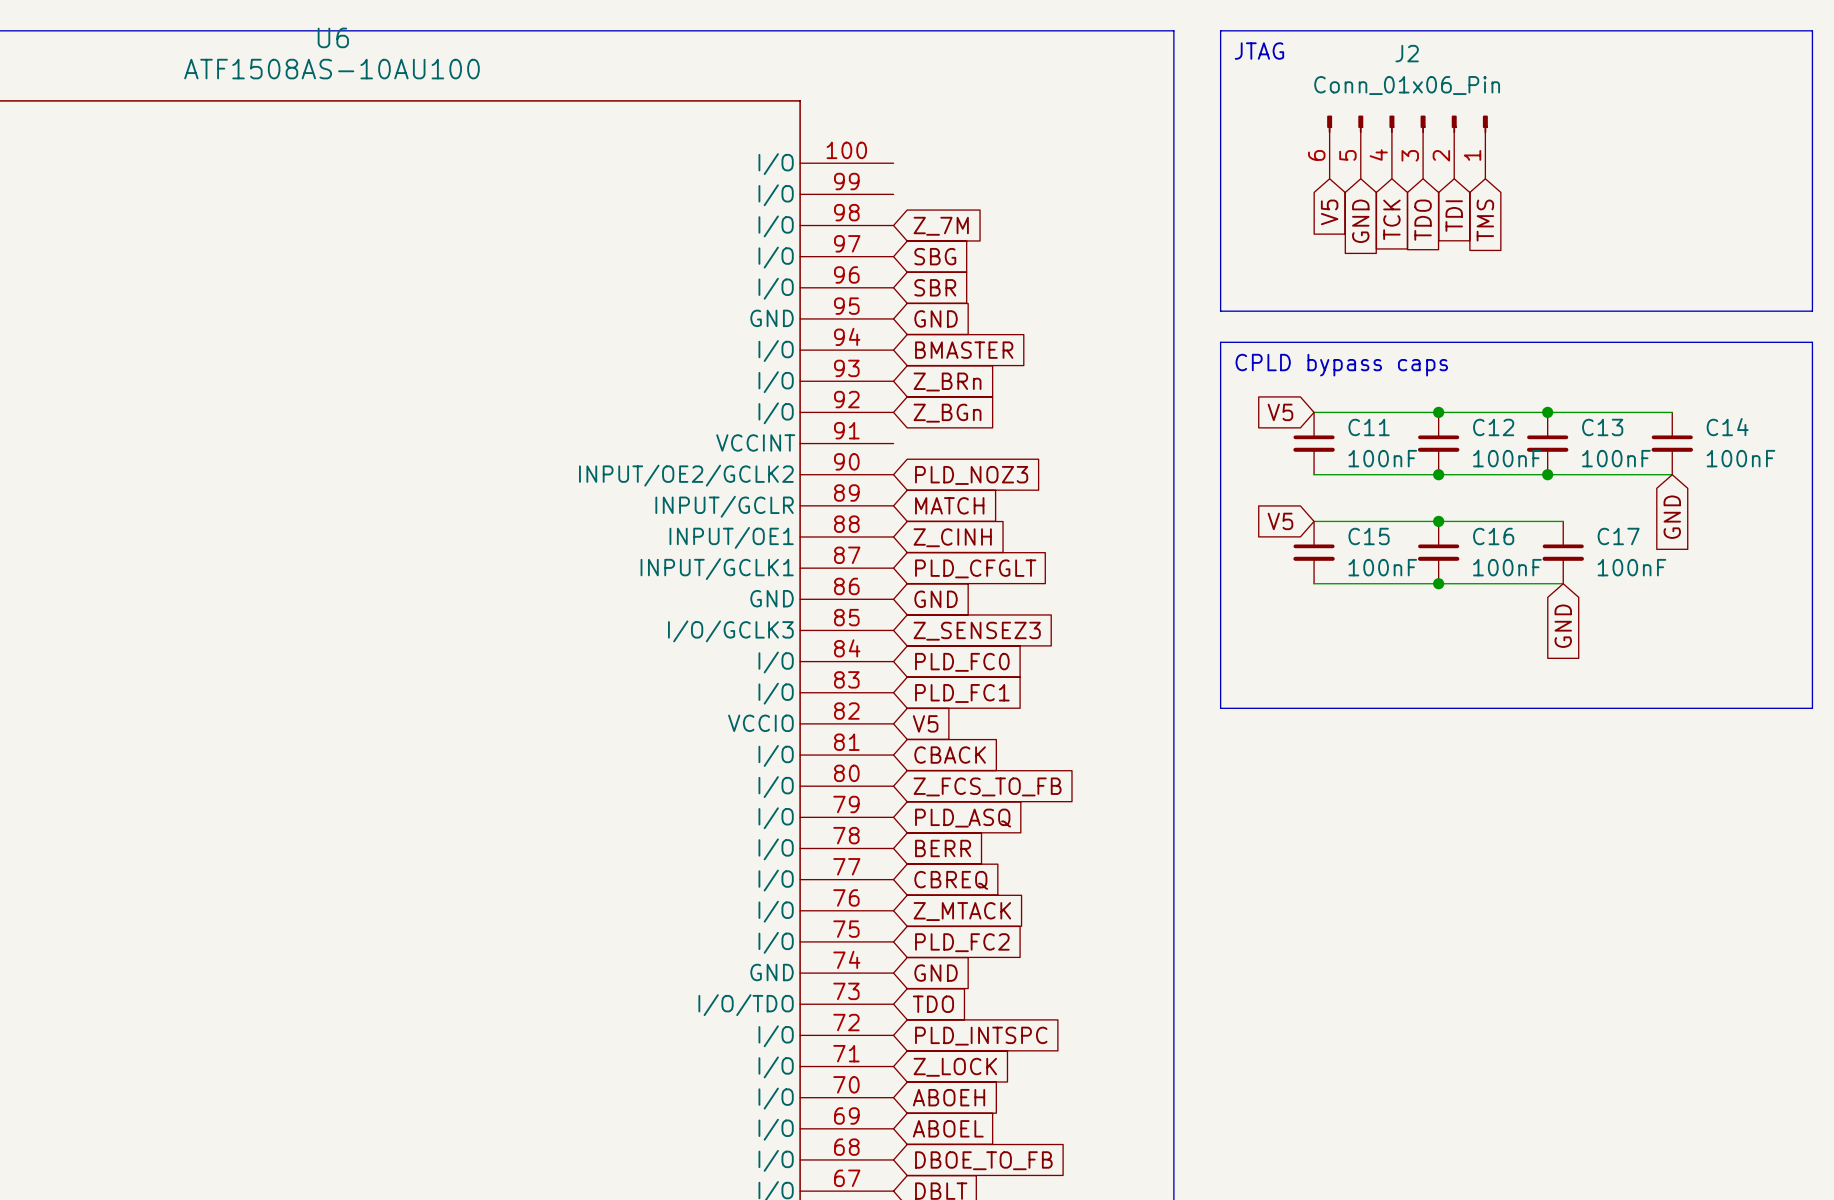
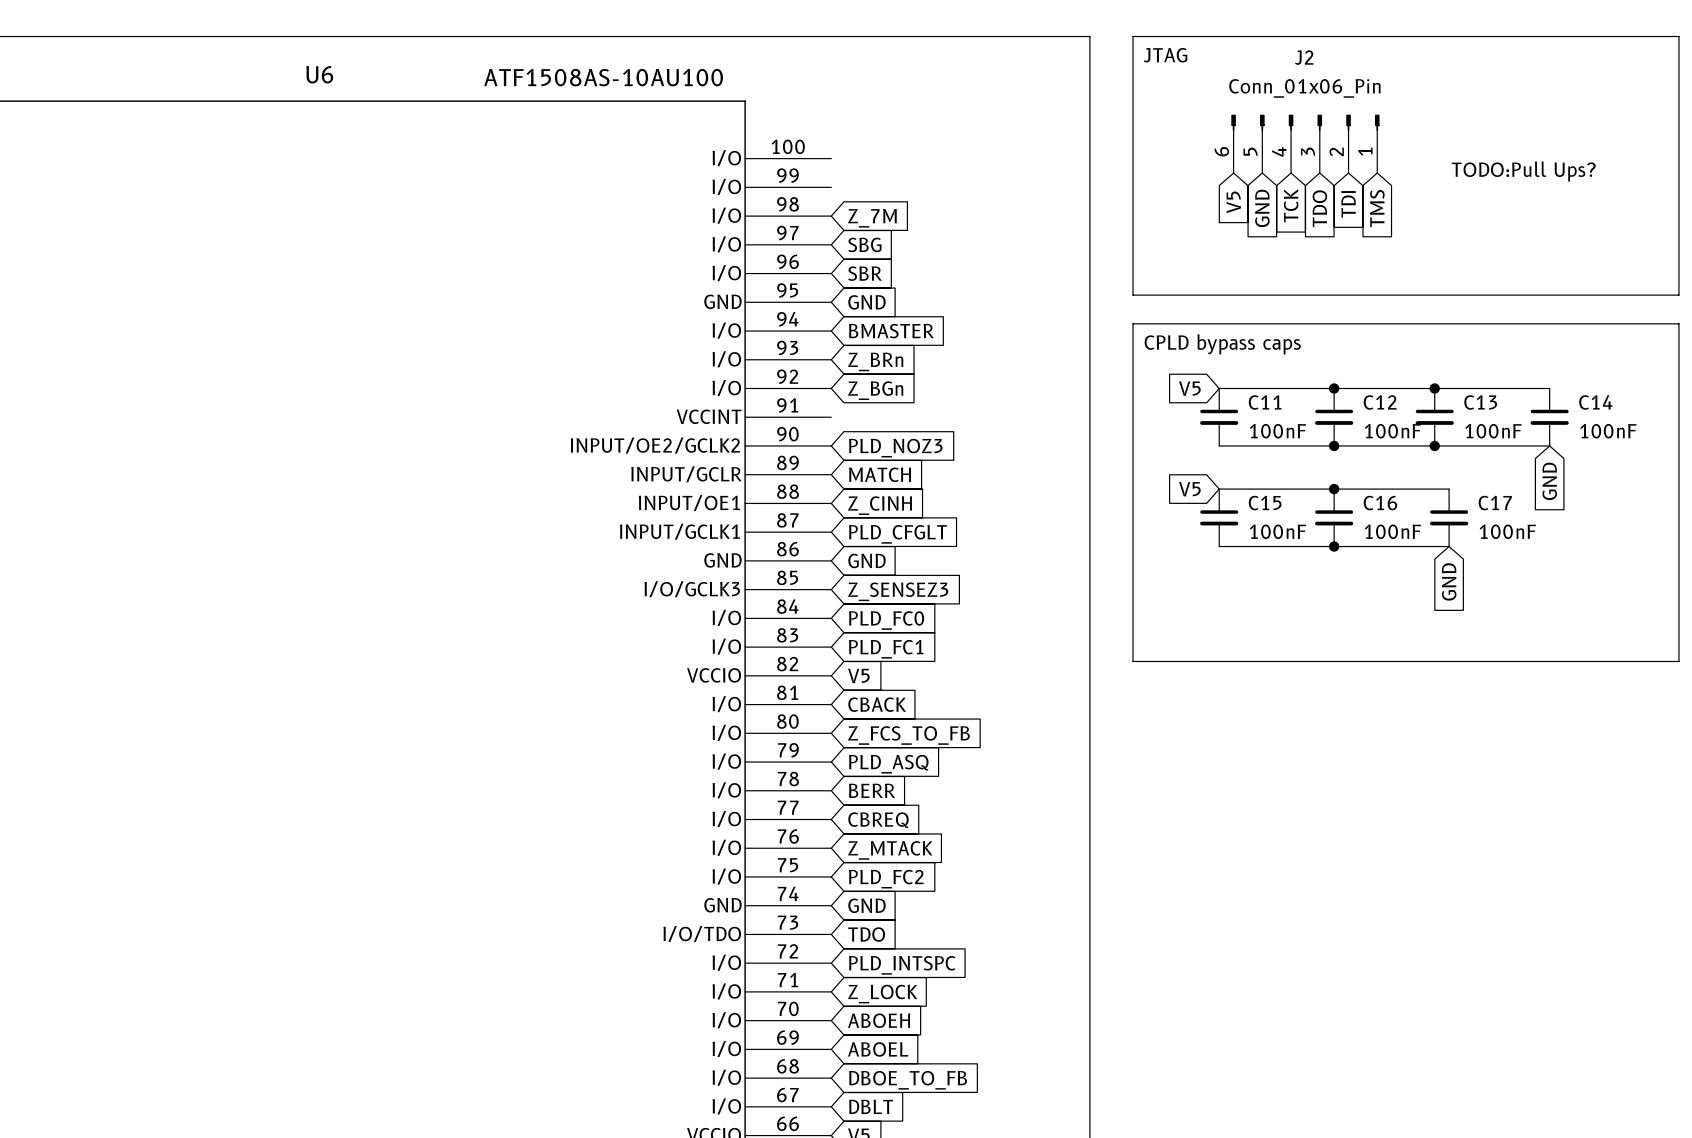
U6 name position: U6 (333, 37) -> U6 (319, 74)
U6 value position: ATF1508AS-10AU100 (331, 69) -> ATF1508AS-10AU100 (603, 77)
text: none -> TODO:Pull Ups? (1523, 171)

